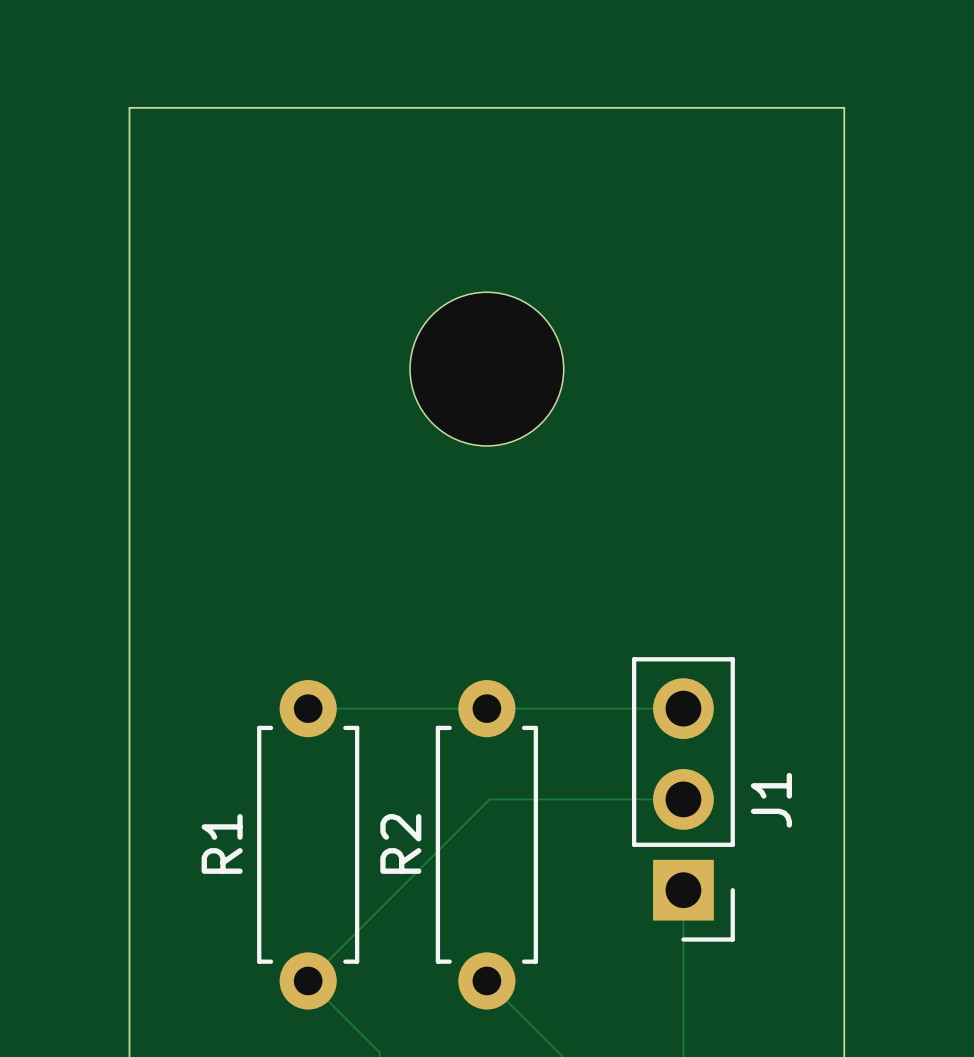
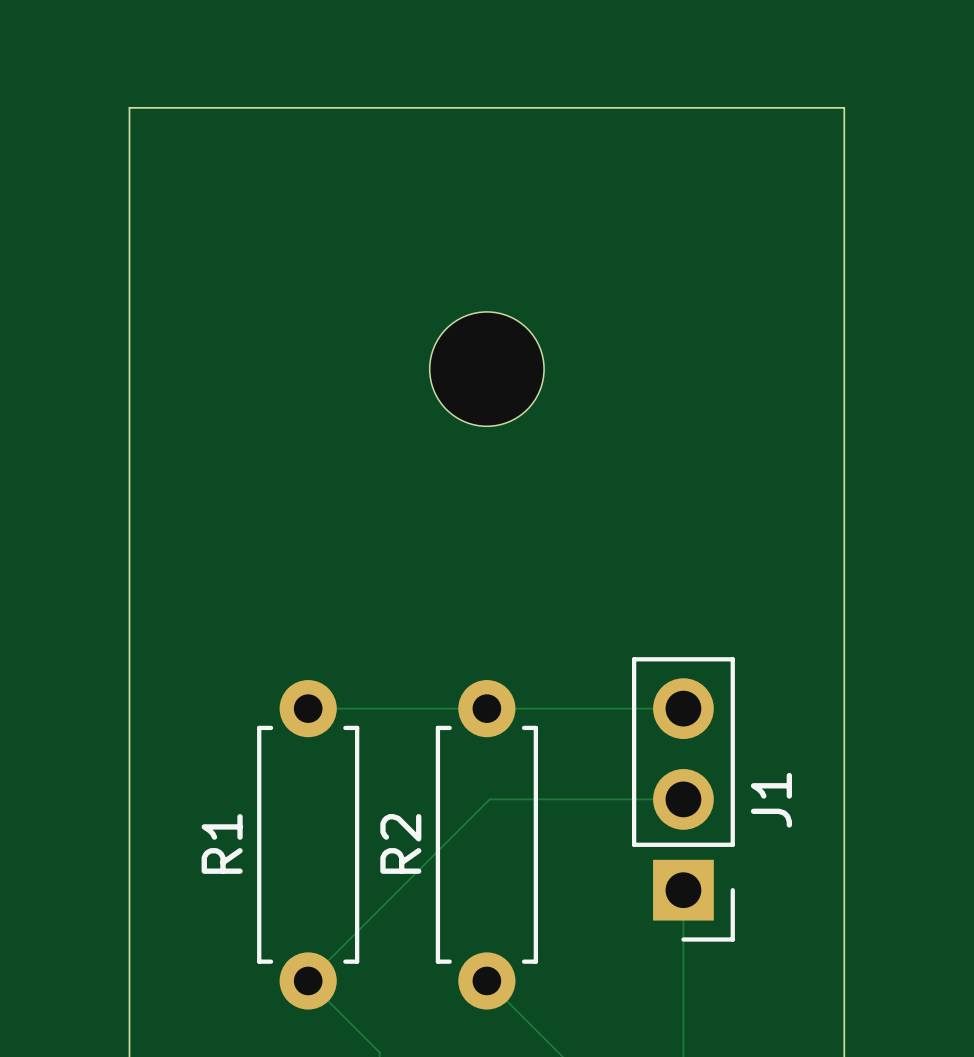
part footprint: [410, 292, 564, 446] -> [429, 311, 545, 427]

